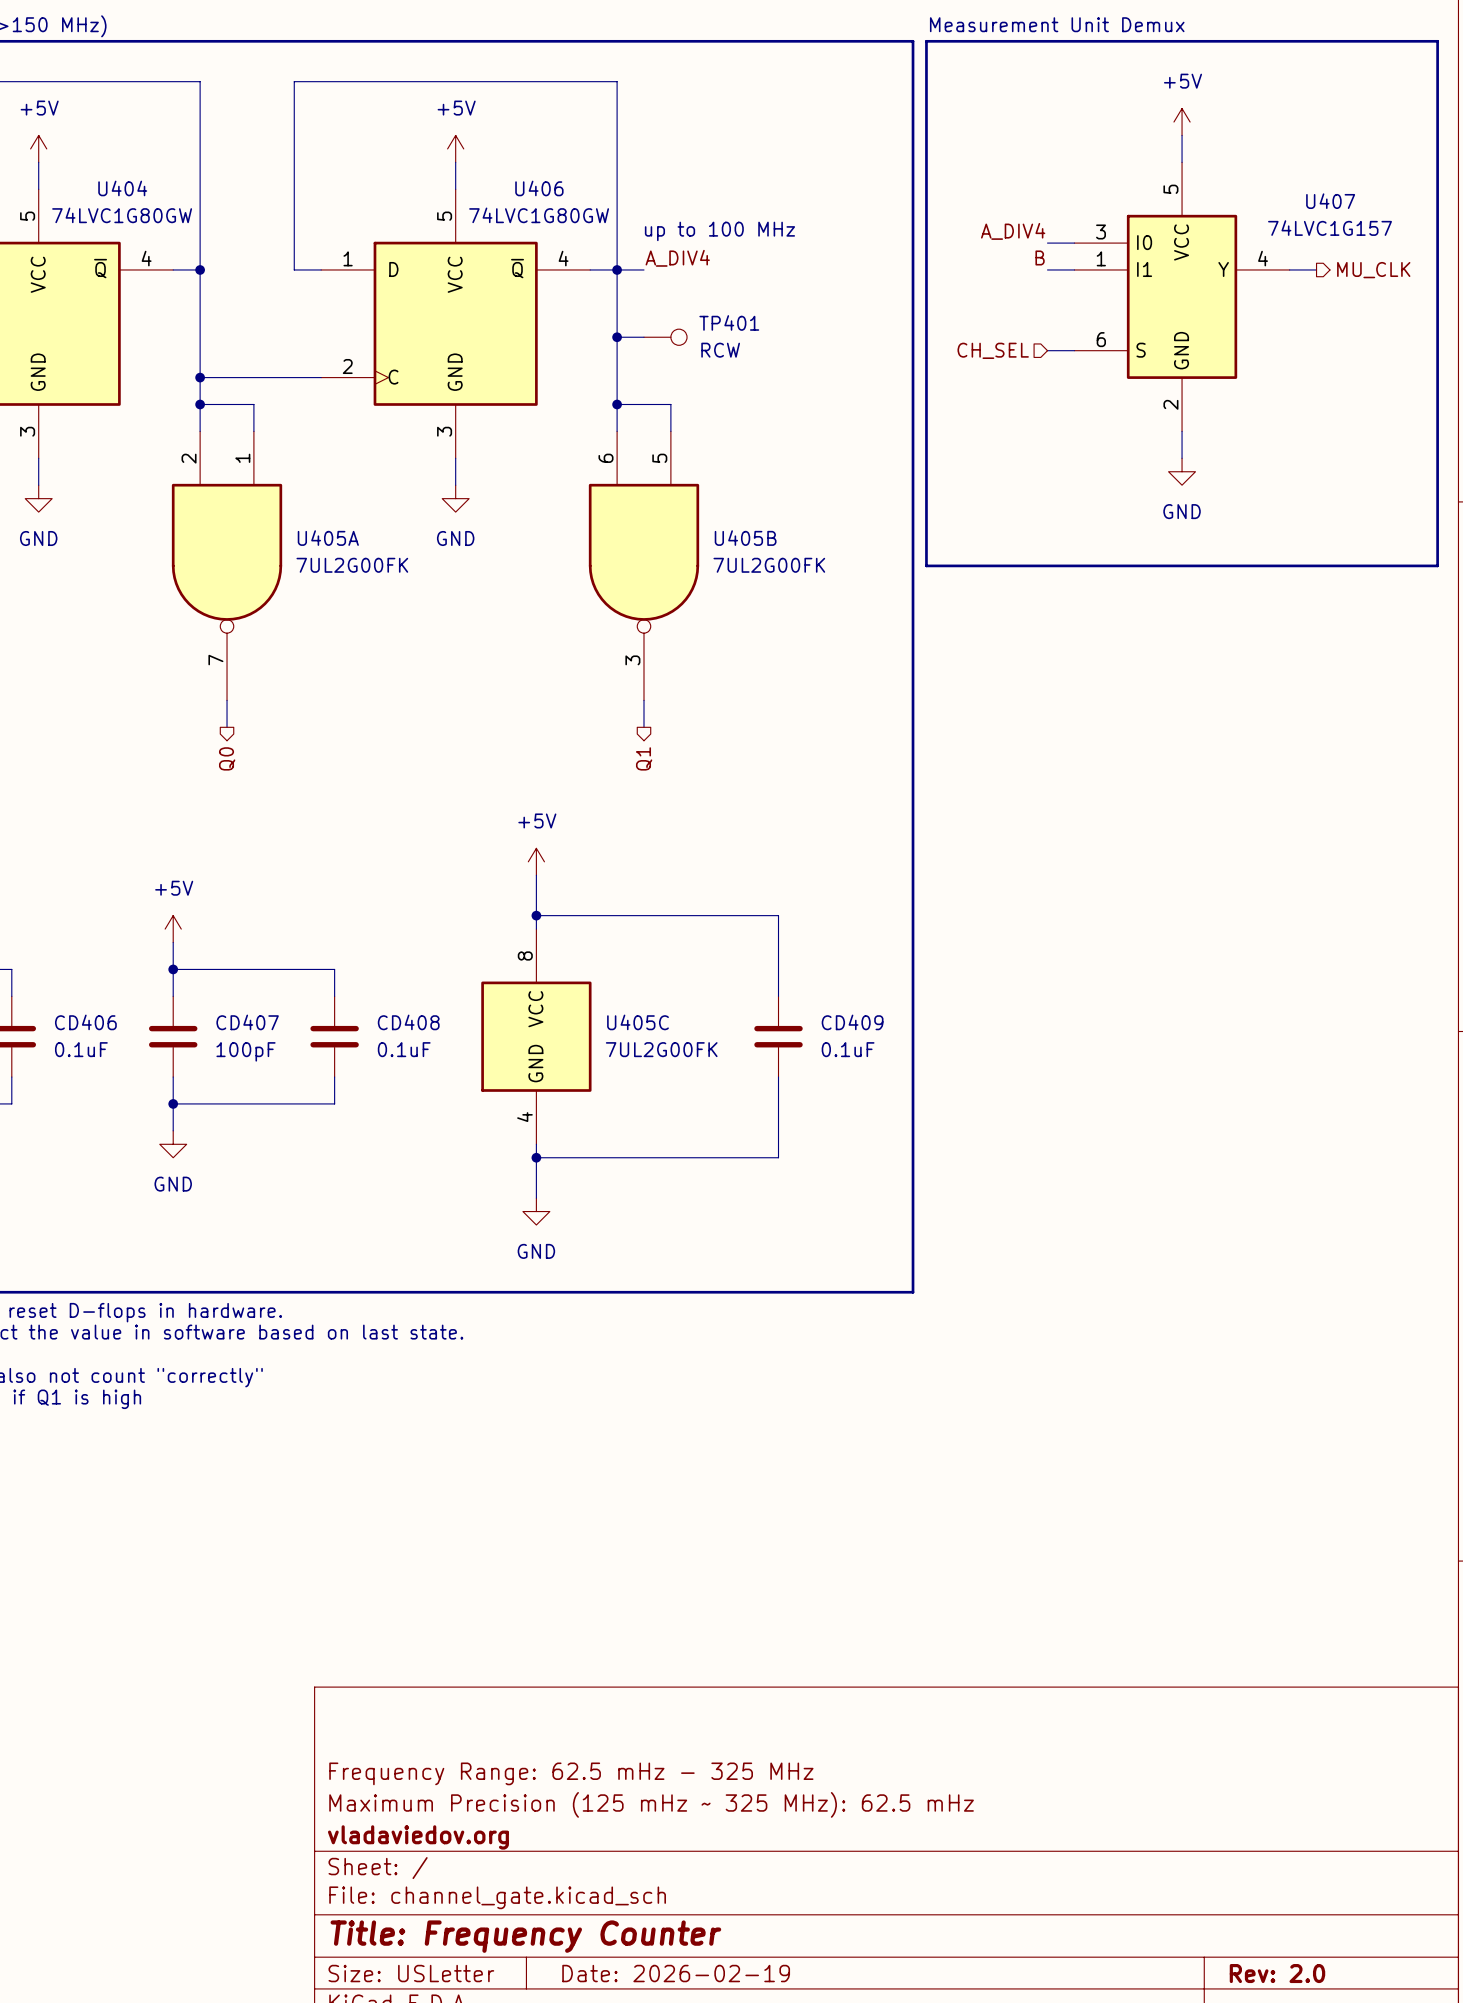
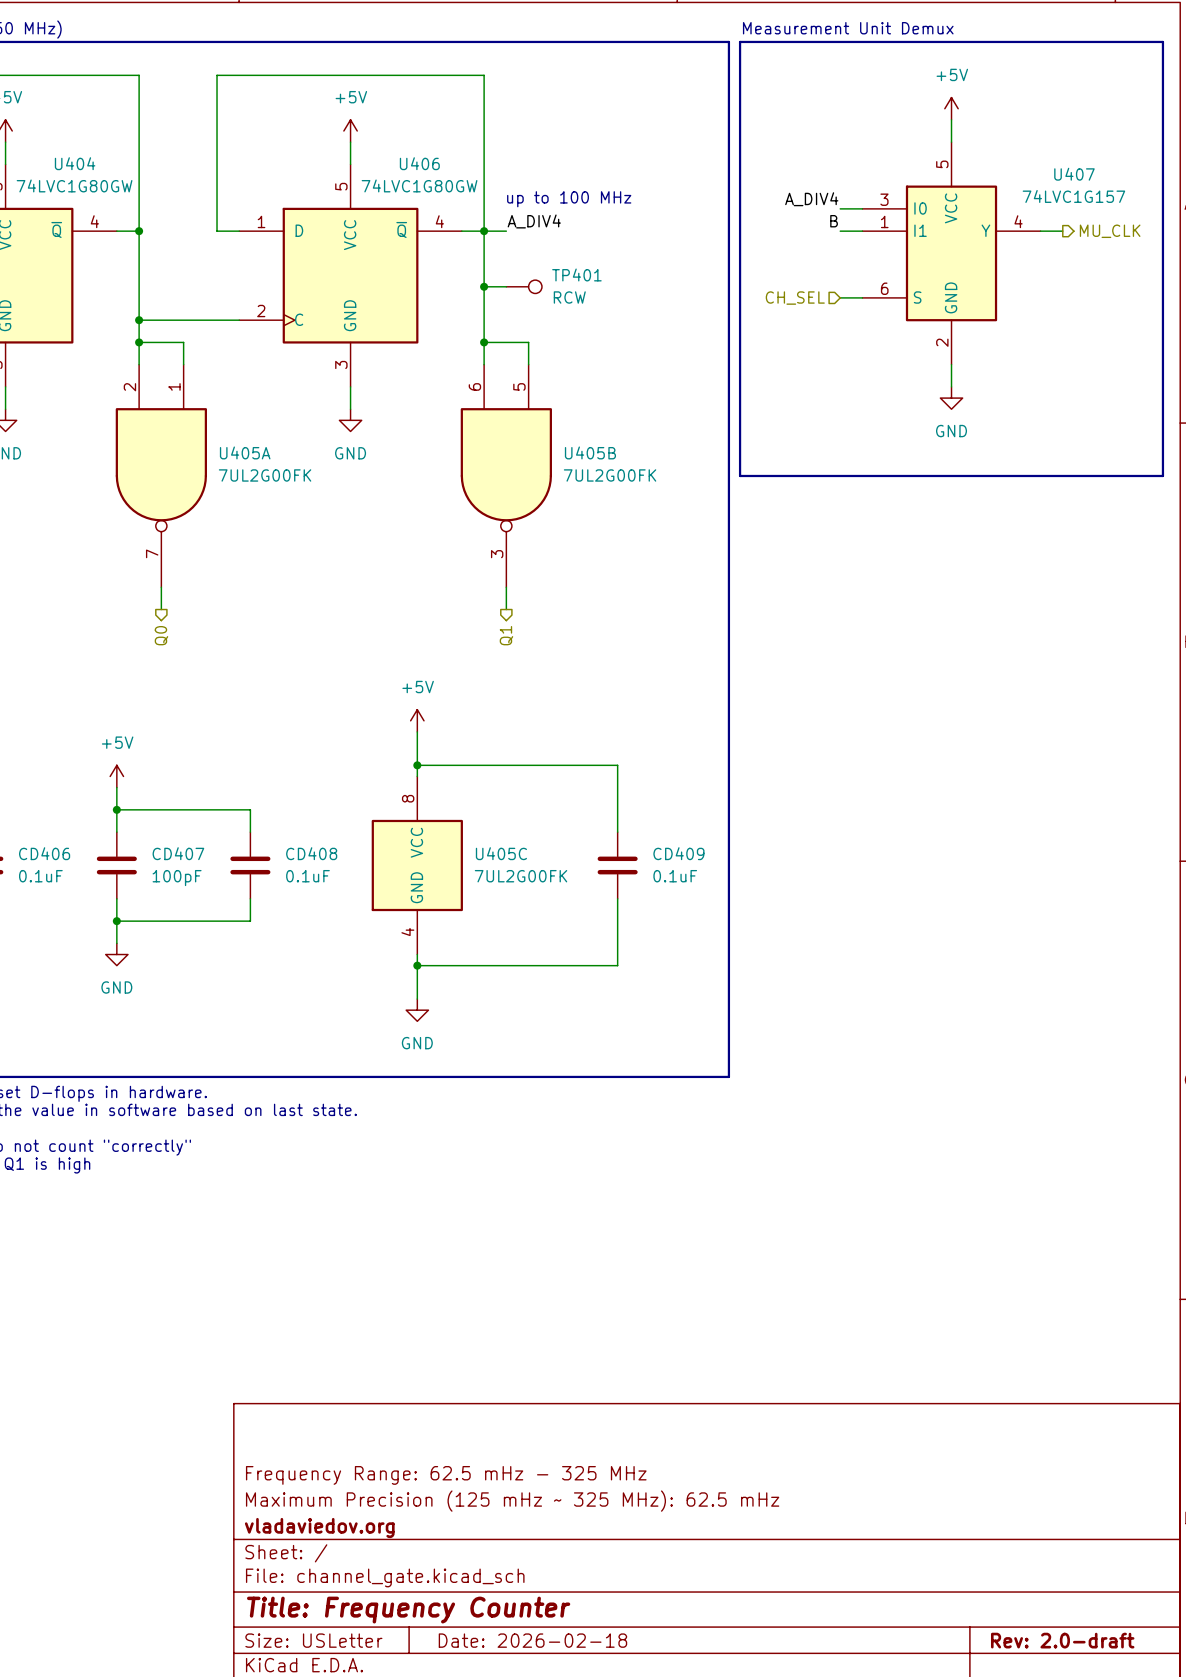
title block: Date: 2026-02-19 (676, 1973) -> Date: 2026-02-18 (532, 1640)
title block: Rev: 2.0 (1277, 1973) -> Rev: 2.0-draft (1062, 1640)

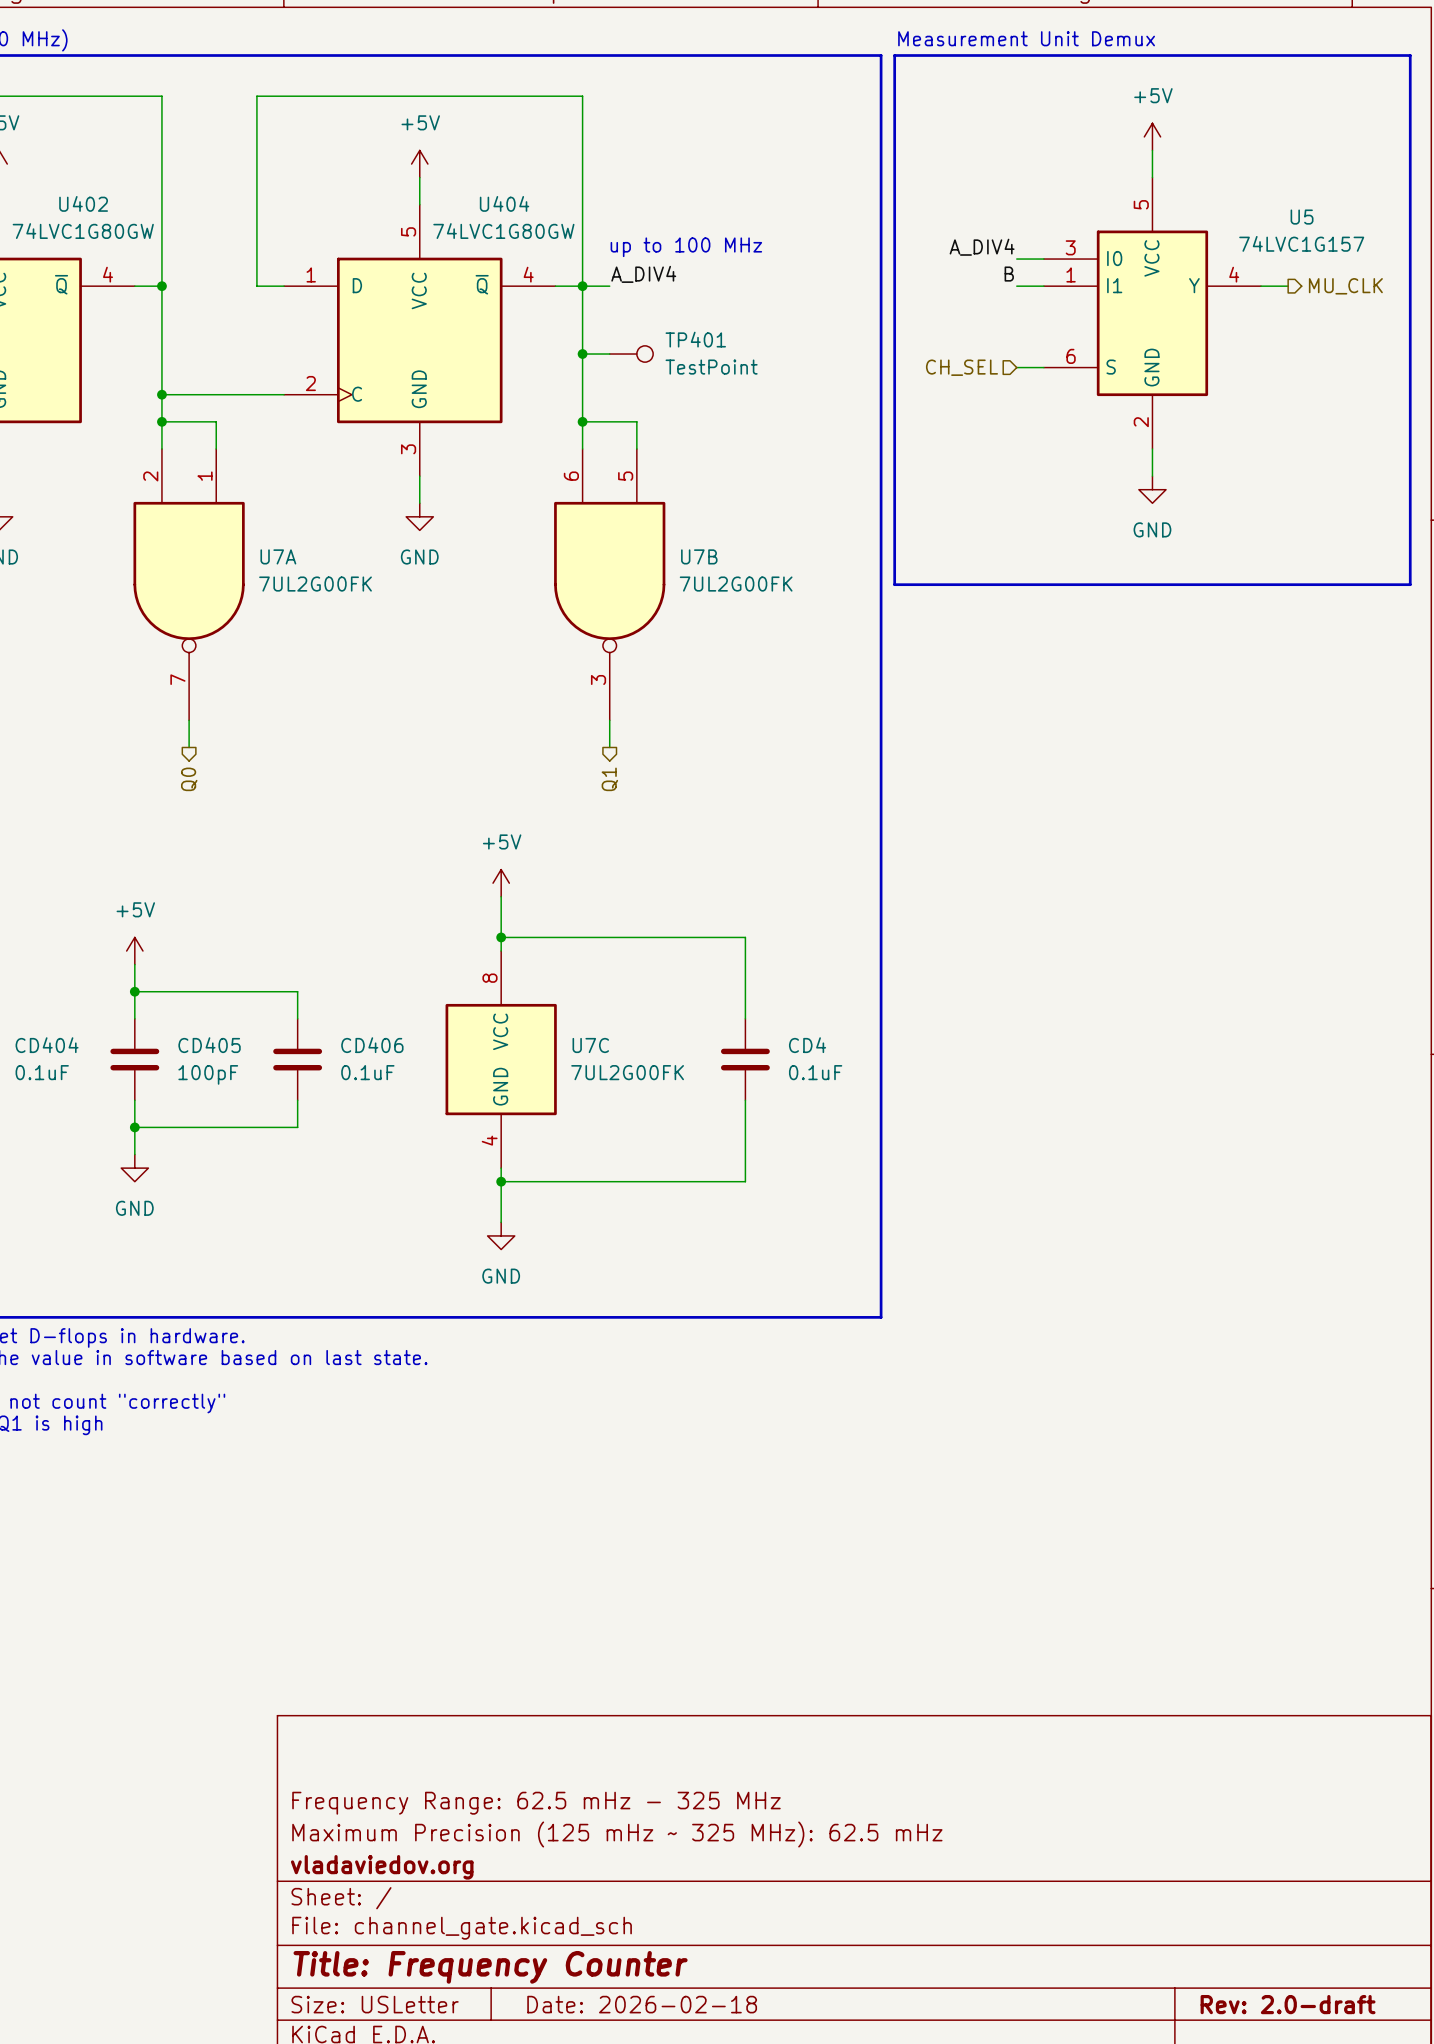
U404 name: U404 (75, 163) -> U402 (83, 203)
U406 name: U406 (419, 163) -> U404 (504, 203)
U407 name: U407 (1074, 174) -> U5 (1302, 217)
TP401 value: RCW (569, 297) -> TestPoint (711, 367)
U405A name: U405A (245, 452) -> U7A (278, 556)
U405B name: U405B (590, 452) -> U7B (699, 556)
CD406 name: CD406 (44, 853) -> CD404 (47, 1045)
CD407 name: CD407 (178, 853) -> CD405 (209, 1045)
CD408 name: CD408 (311, 853) -> CD406 (372, 1045)
U405C name: U405C (501, 853) -> U7C (590, 1045)
CD409 name: CD409 (678, 853) -> CD4 (807, 1045)

